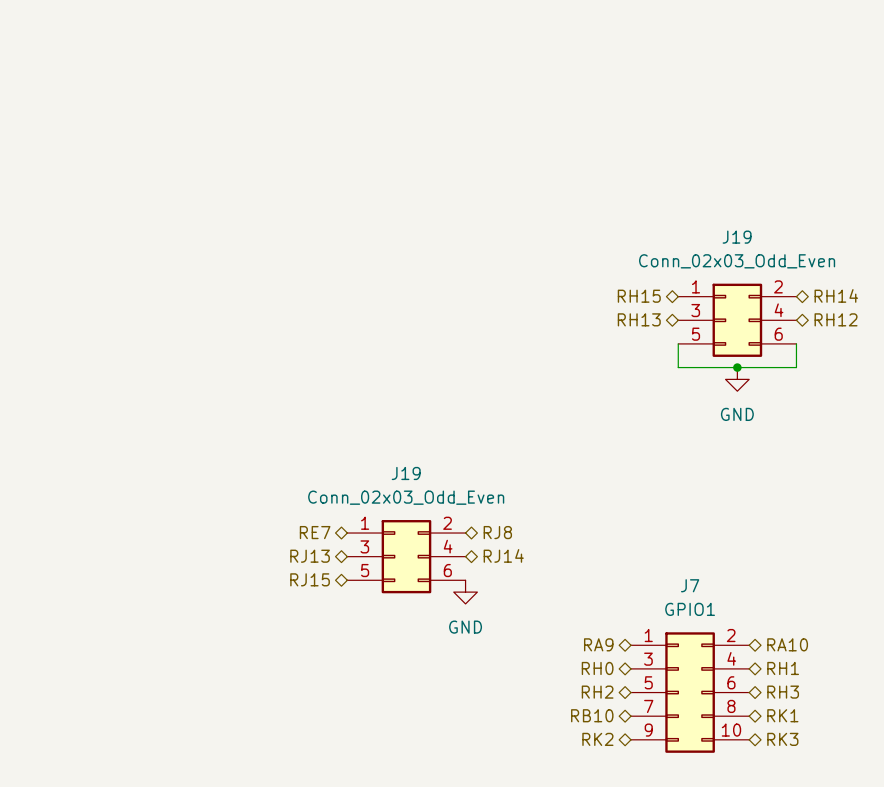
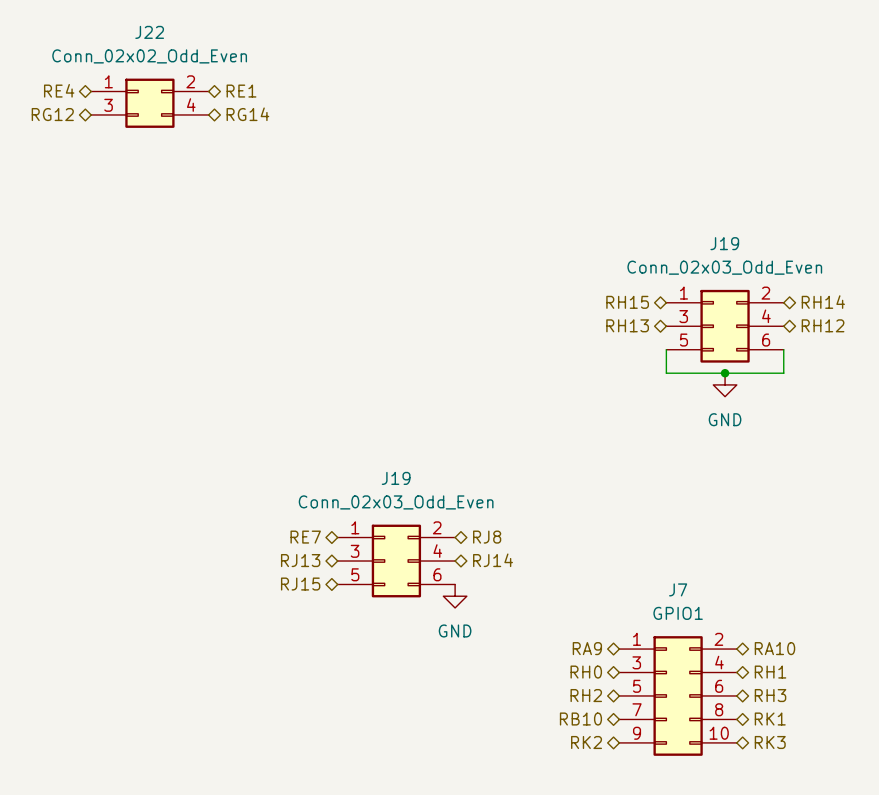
hierarchical label: none -> RE4 (59, 90)
hierarchical label: none -> RE1 (241, 91)
J22: none -> Conn_02x02_Odd_Even (149, 103)
hierarchical label: none -> RG14 (247, 114)
hierarchical label: none -> RG12 (52, 114)

